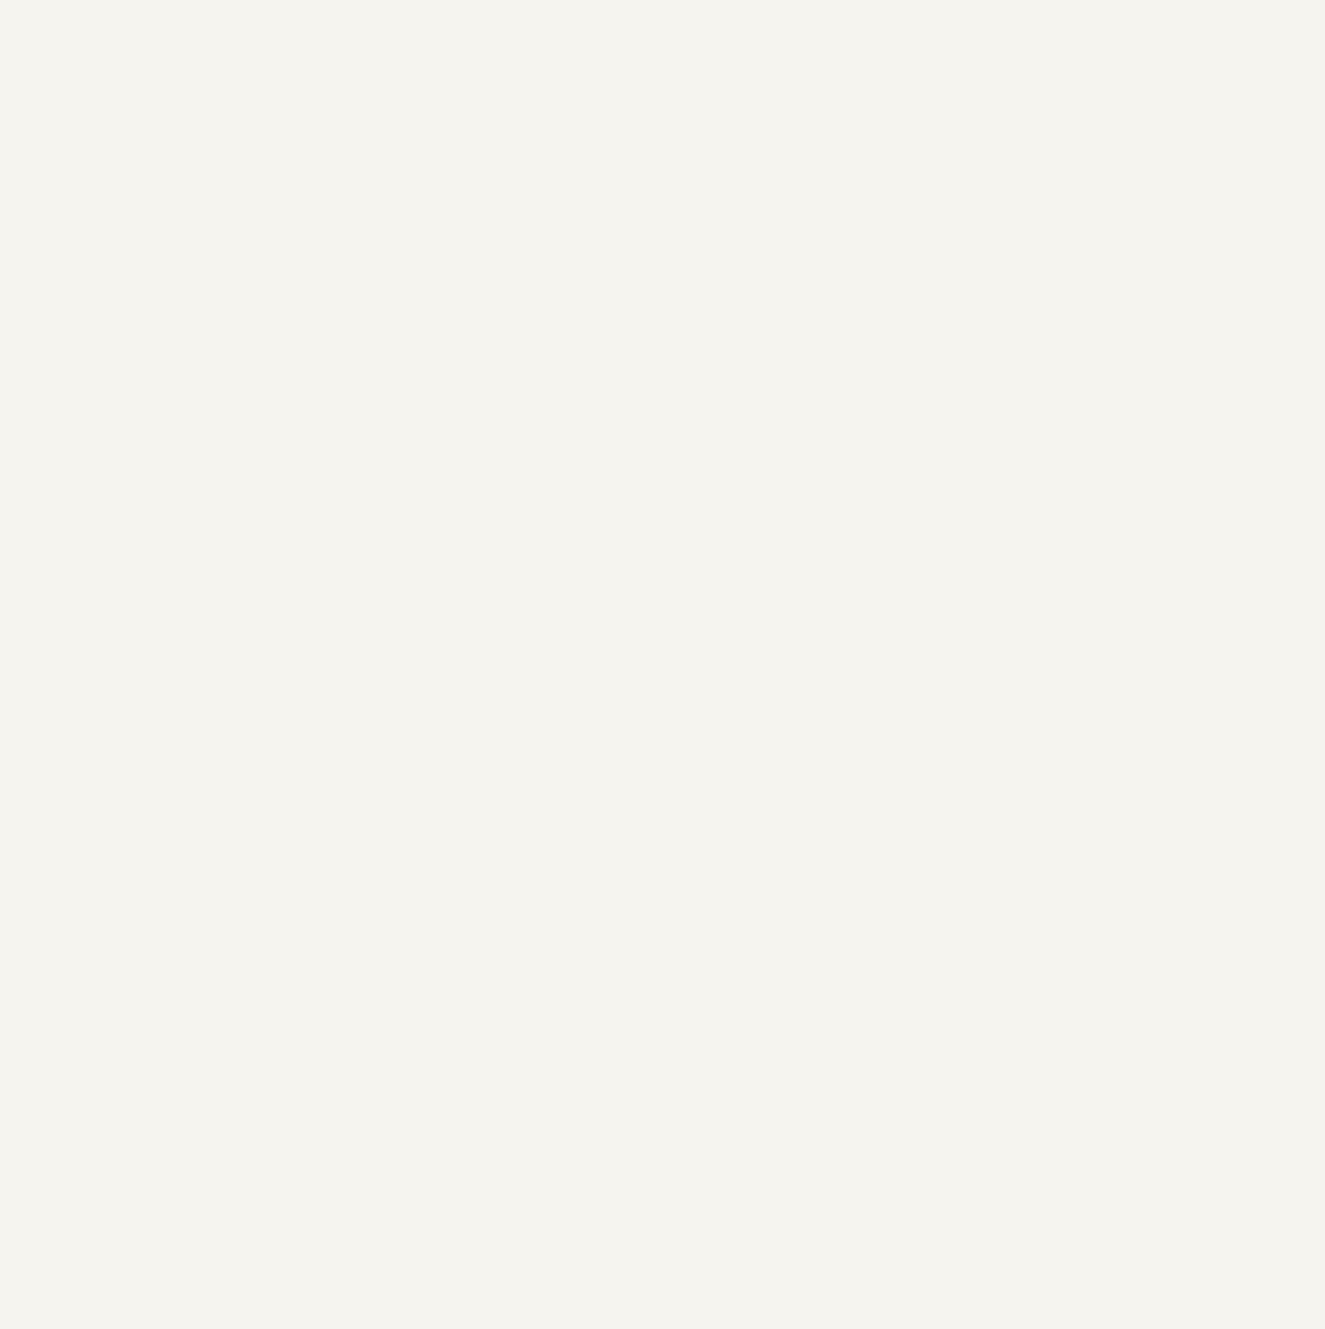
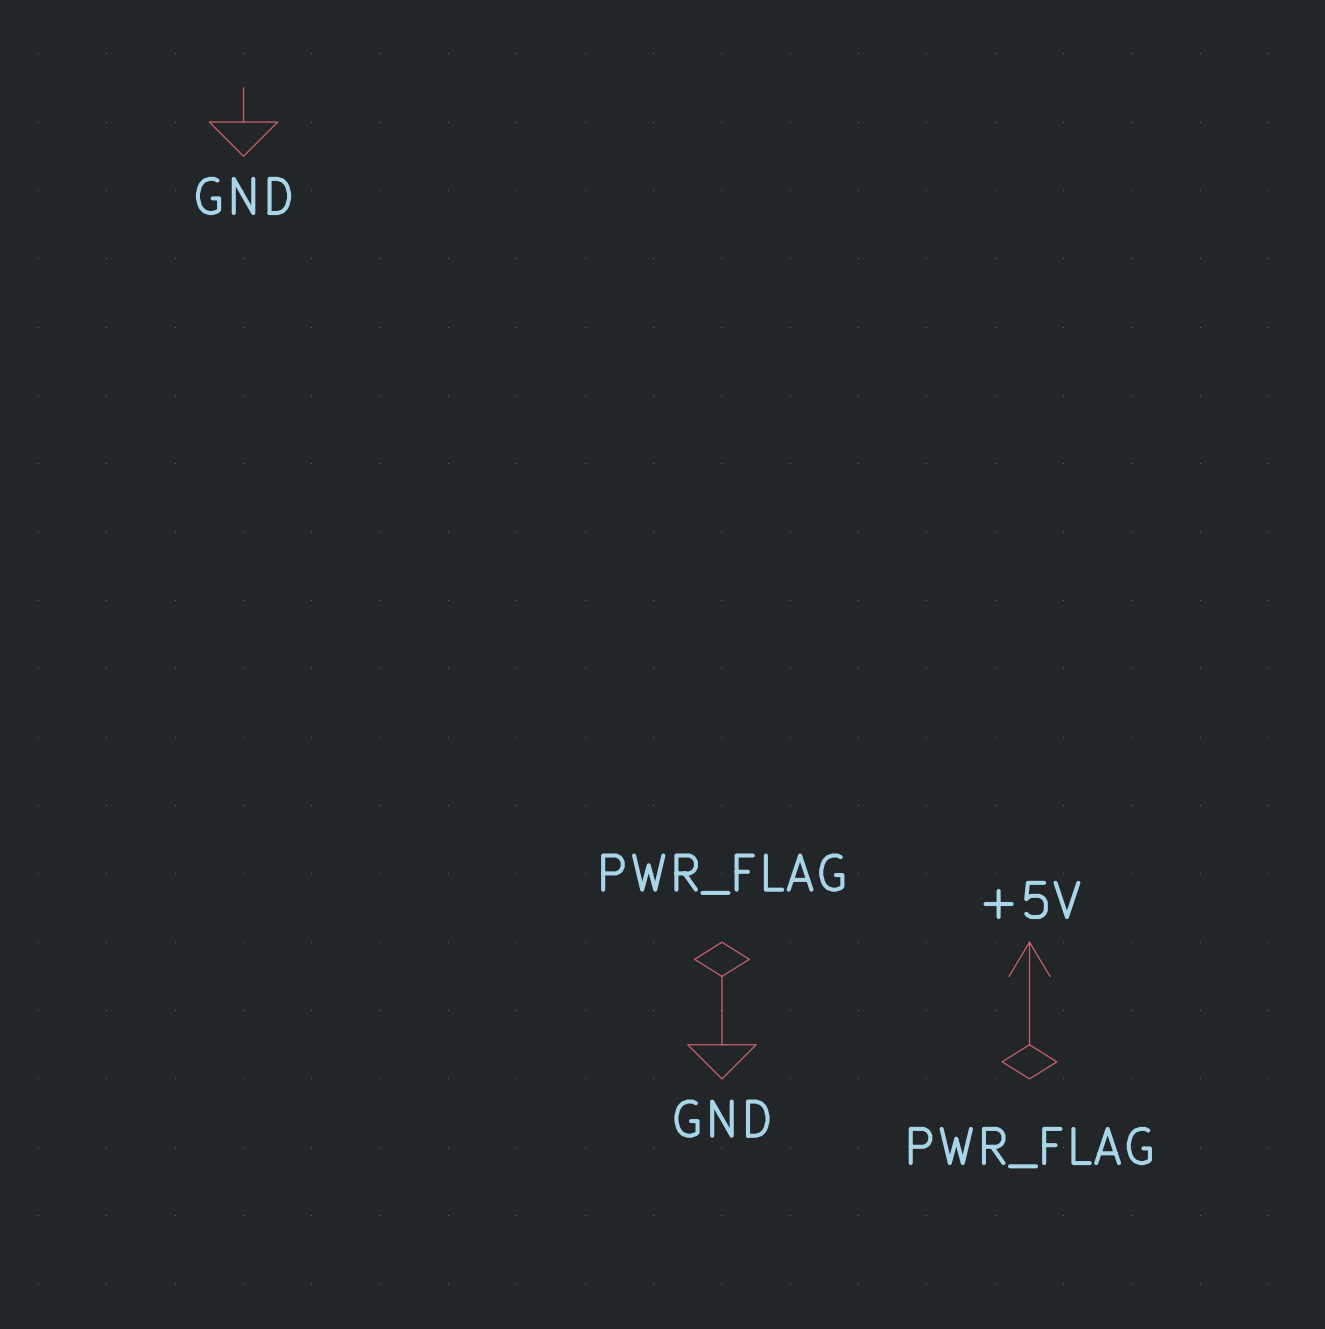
power symbol: none -> GND (243, 122)
power symbol: none -> PWR_FLAG (721, 976)
power symbol: none -> +5V (1029, 976)
power symbol: none -> GND (721, 1044)
power symbol: none -> PWR_FLAG (1029, 1044)

